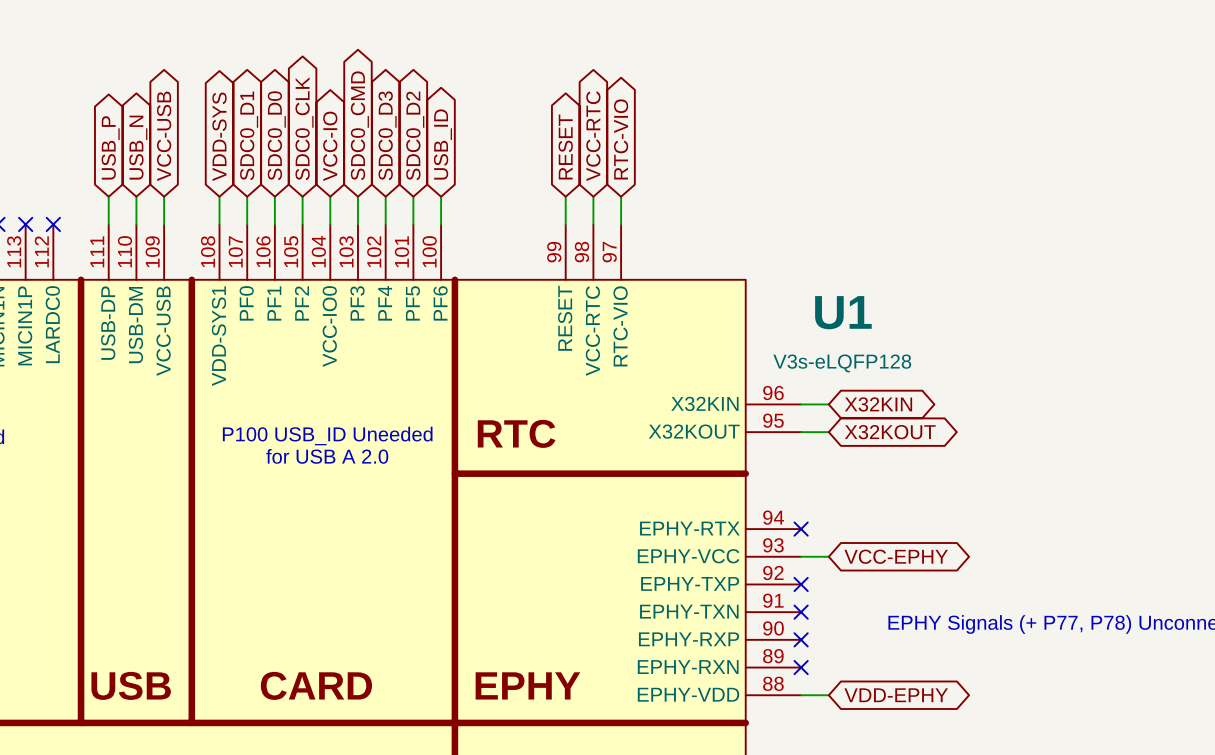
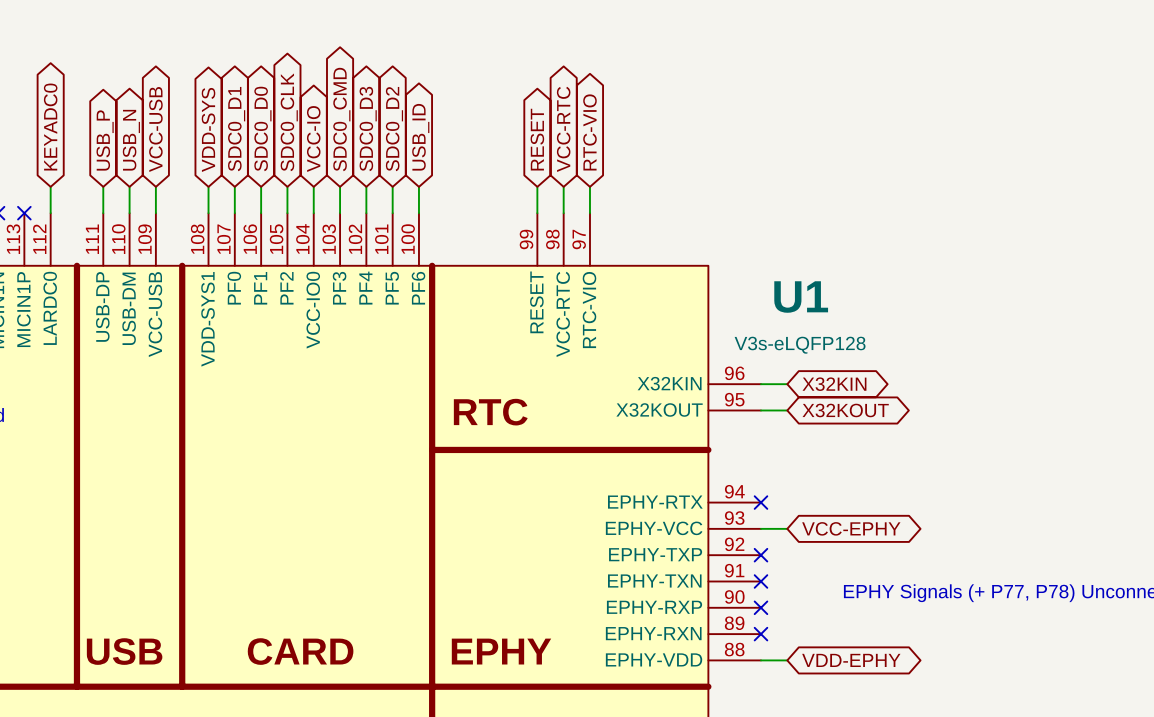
global label: none -> KEYADC0 (50, 127)
wire: none -> (50, 186) (50, 213)
no-connect mark: (53, 224) -> none
text: P100 USB_ID Uneeded (327, 435) -> none
text: for USB A 2.0 (327, 456) -> none

